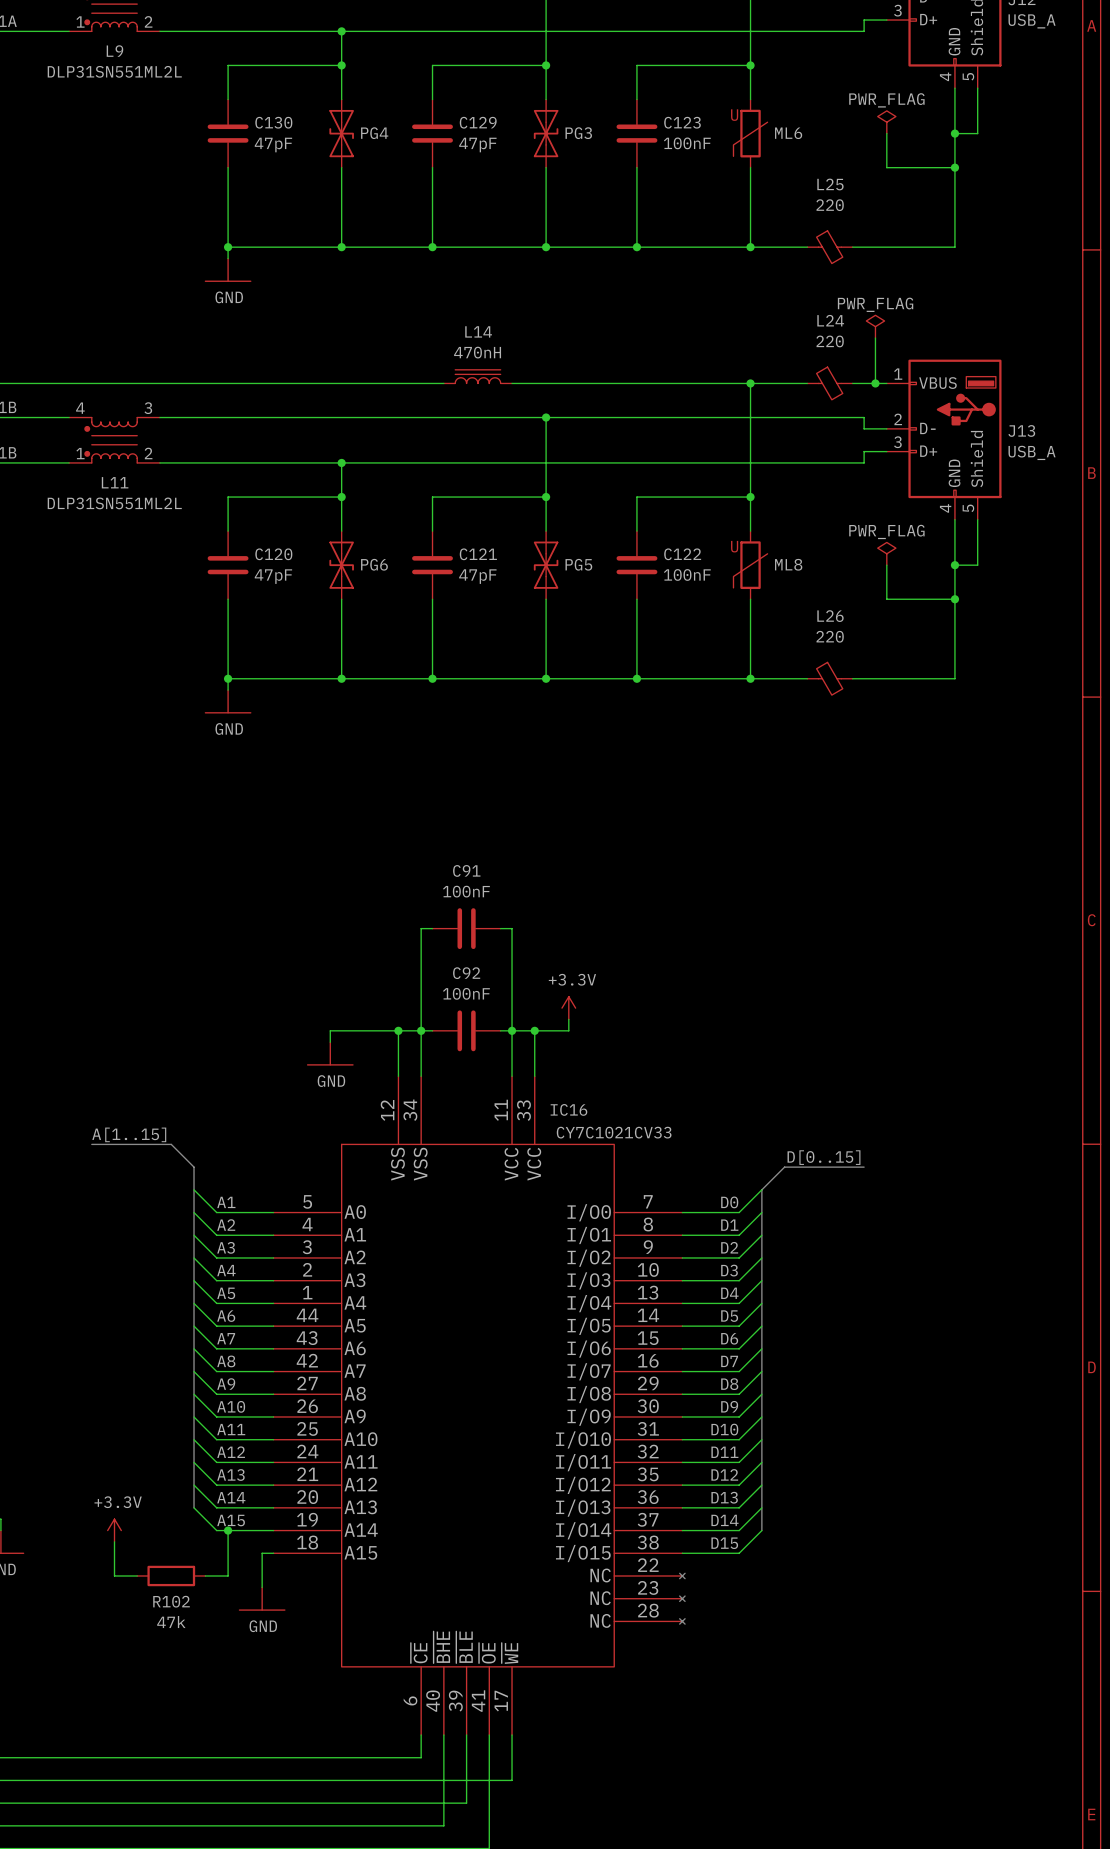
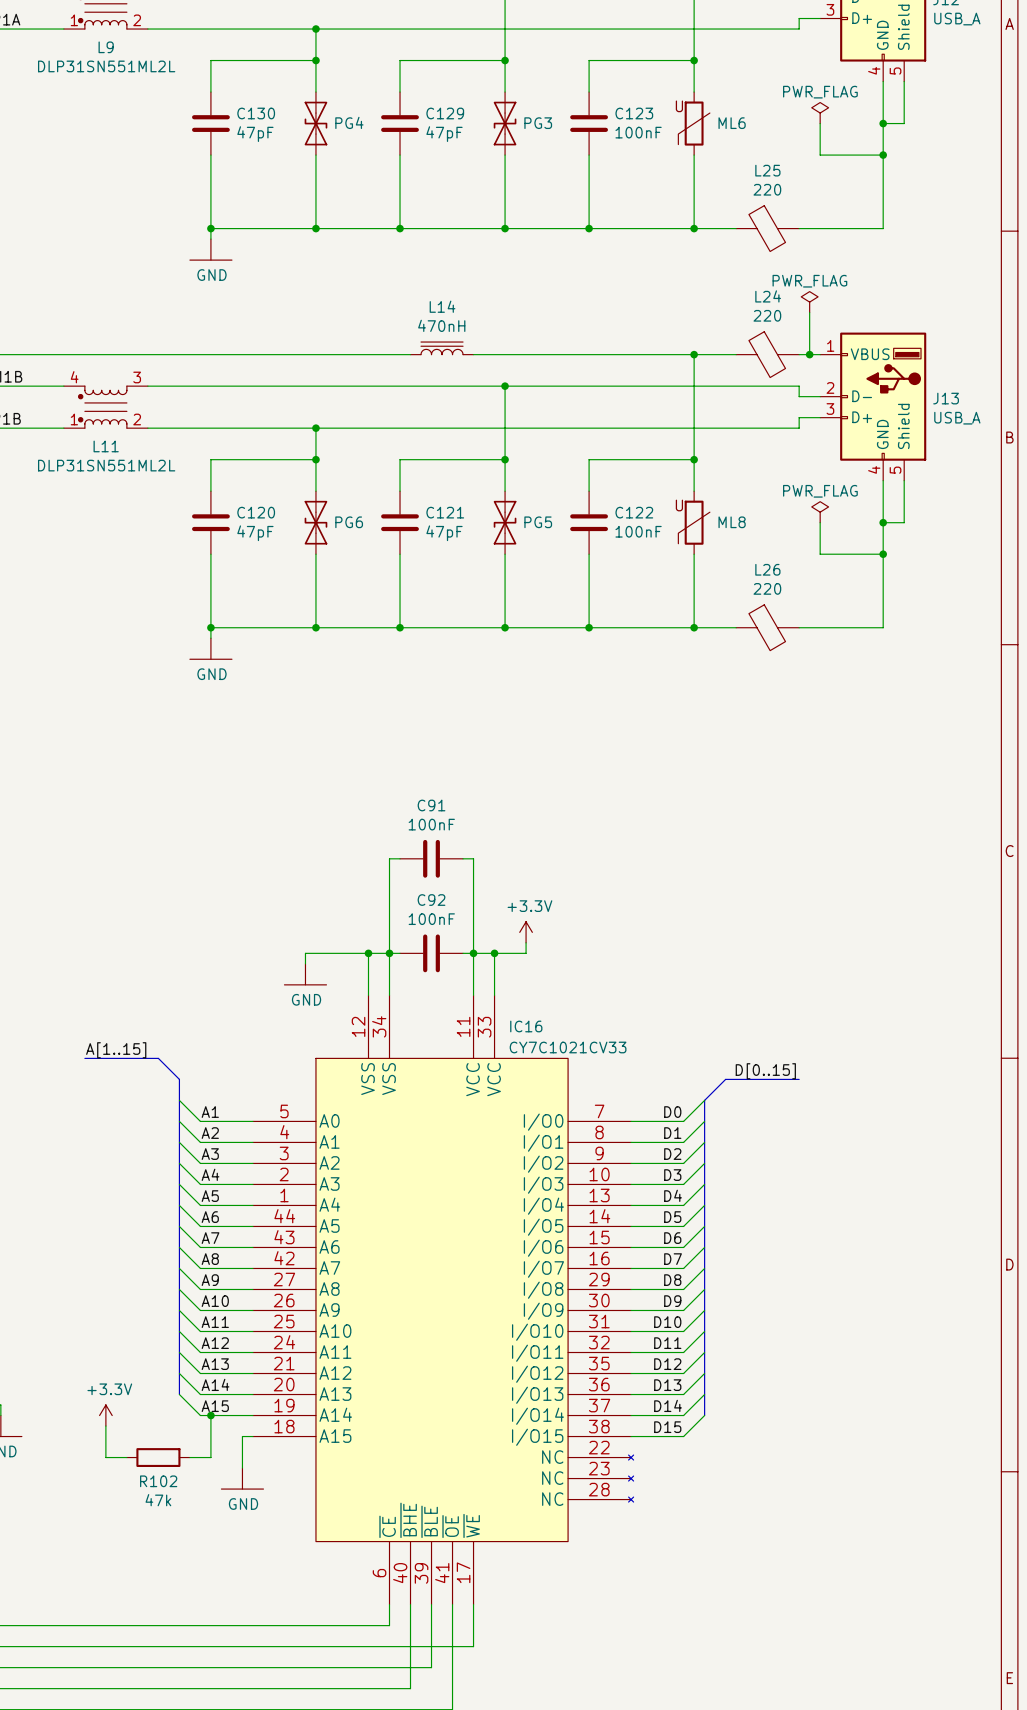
L25 symbol: [807, 230, 853, 264] -> [736, 205, 800, 252]
L24 symbol: [807, 367, 853, 400] -> [736, 331, 800, 378]
L26 symbol: [807, 662, 853, 696] -> [736, 604, 800, 651]

